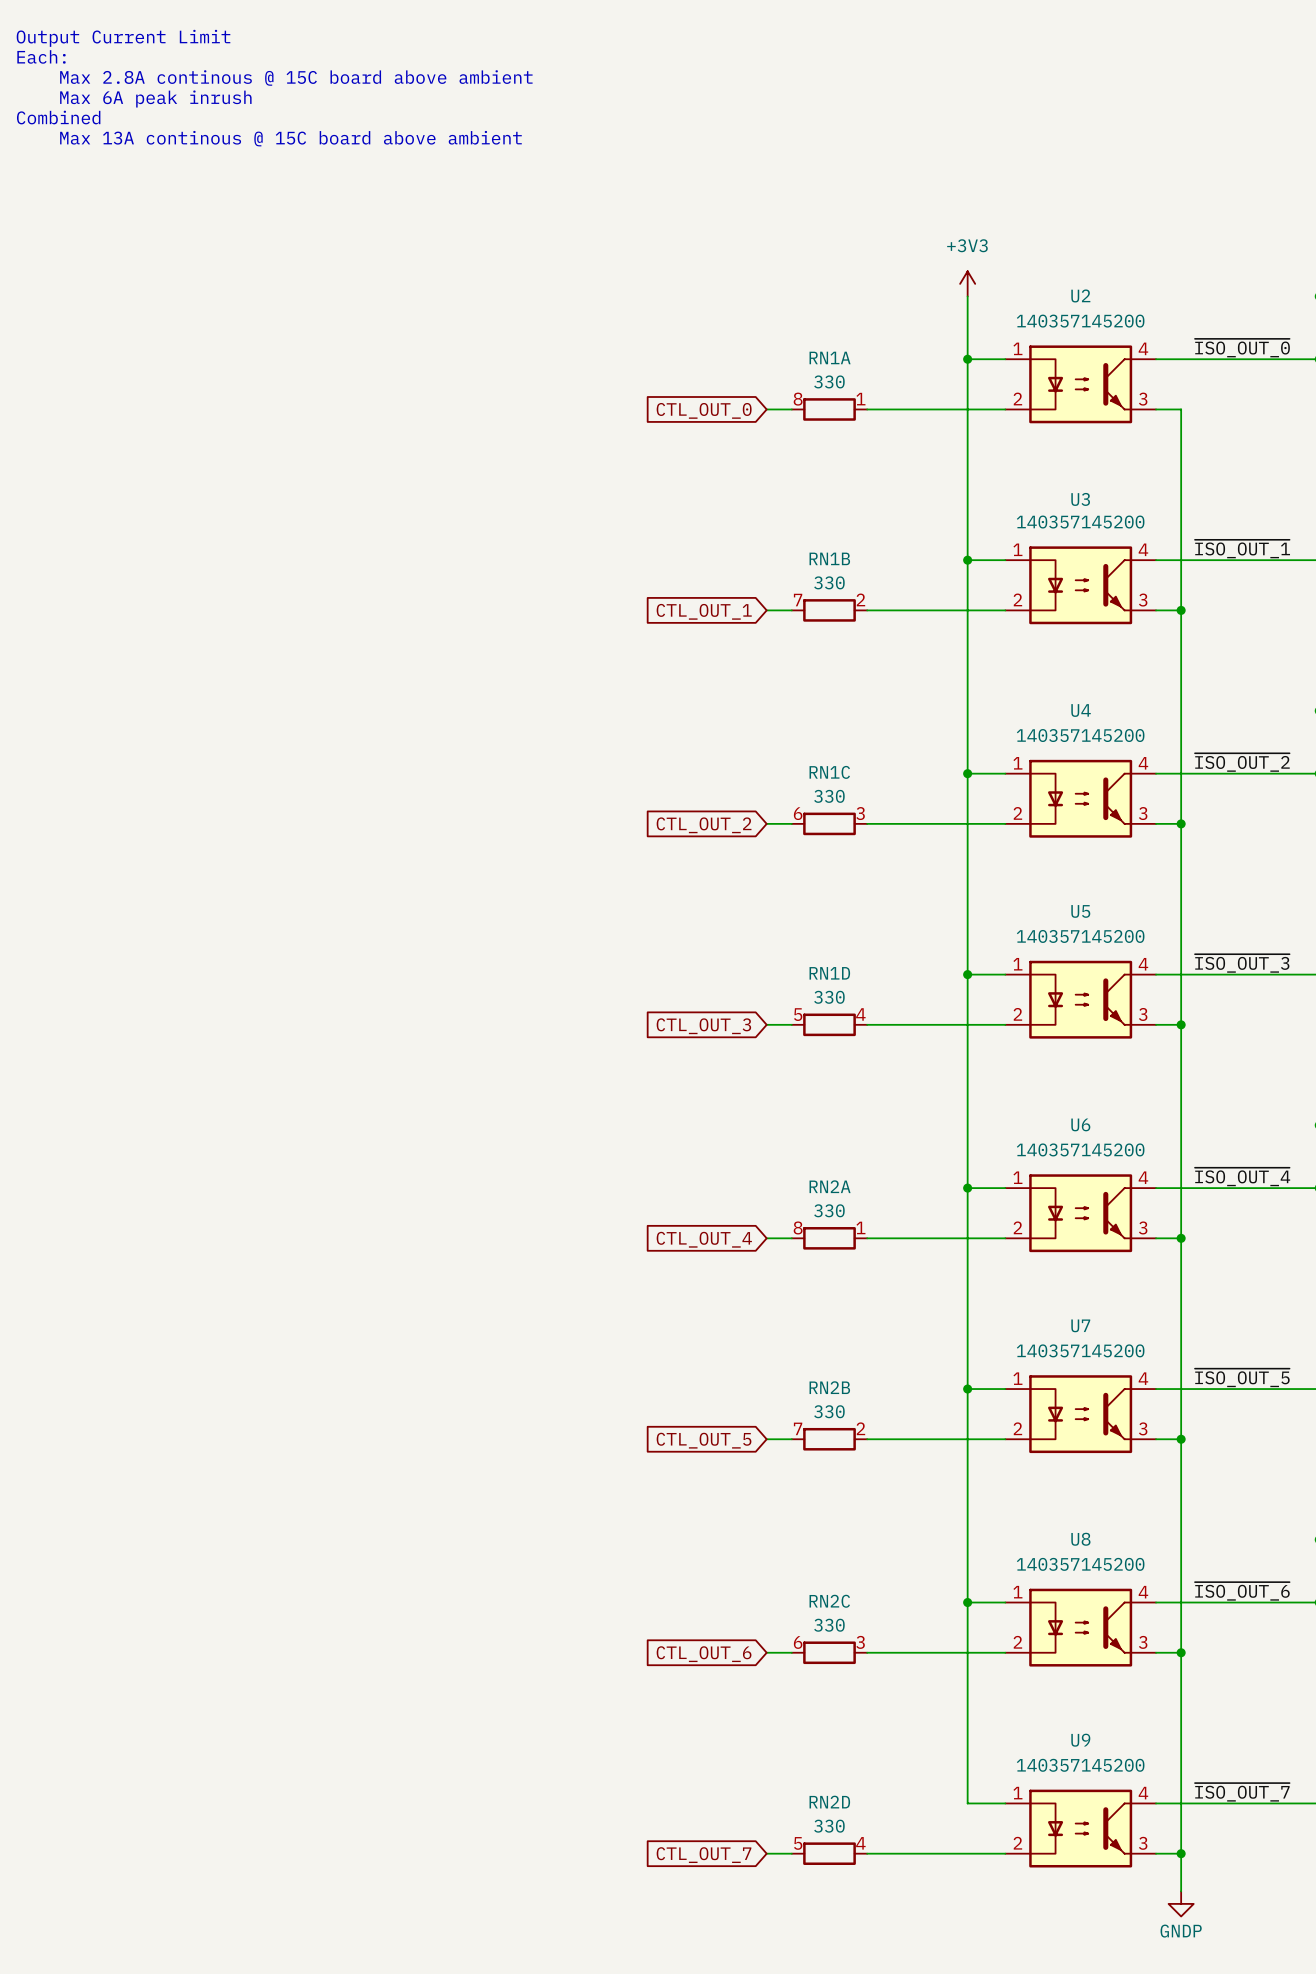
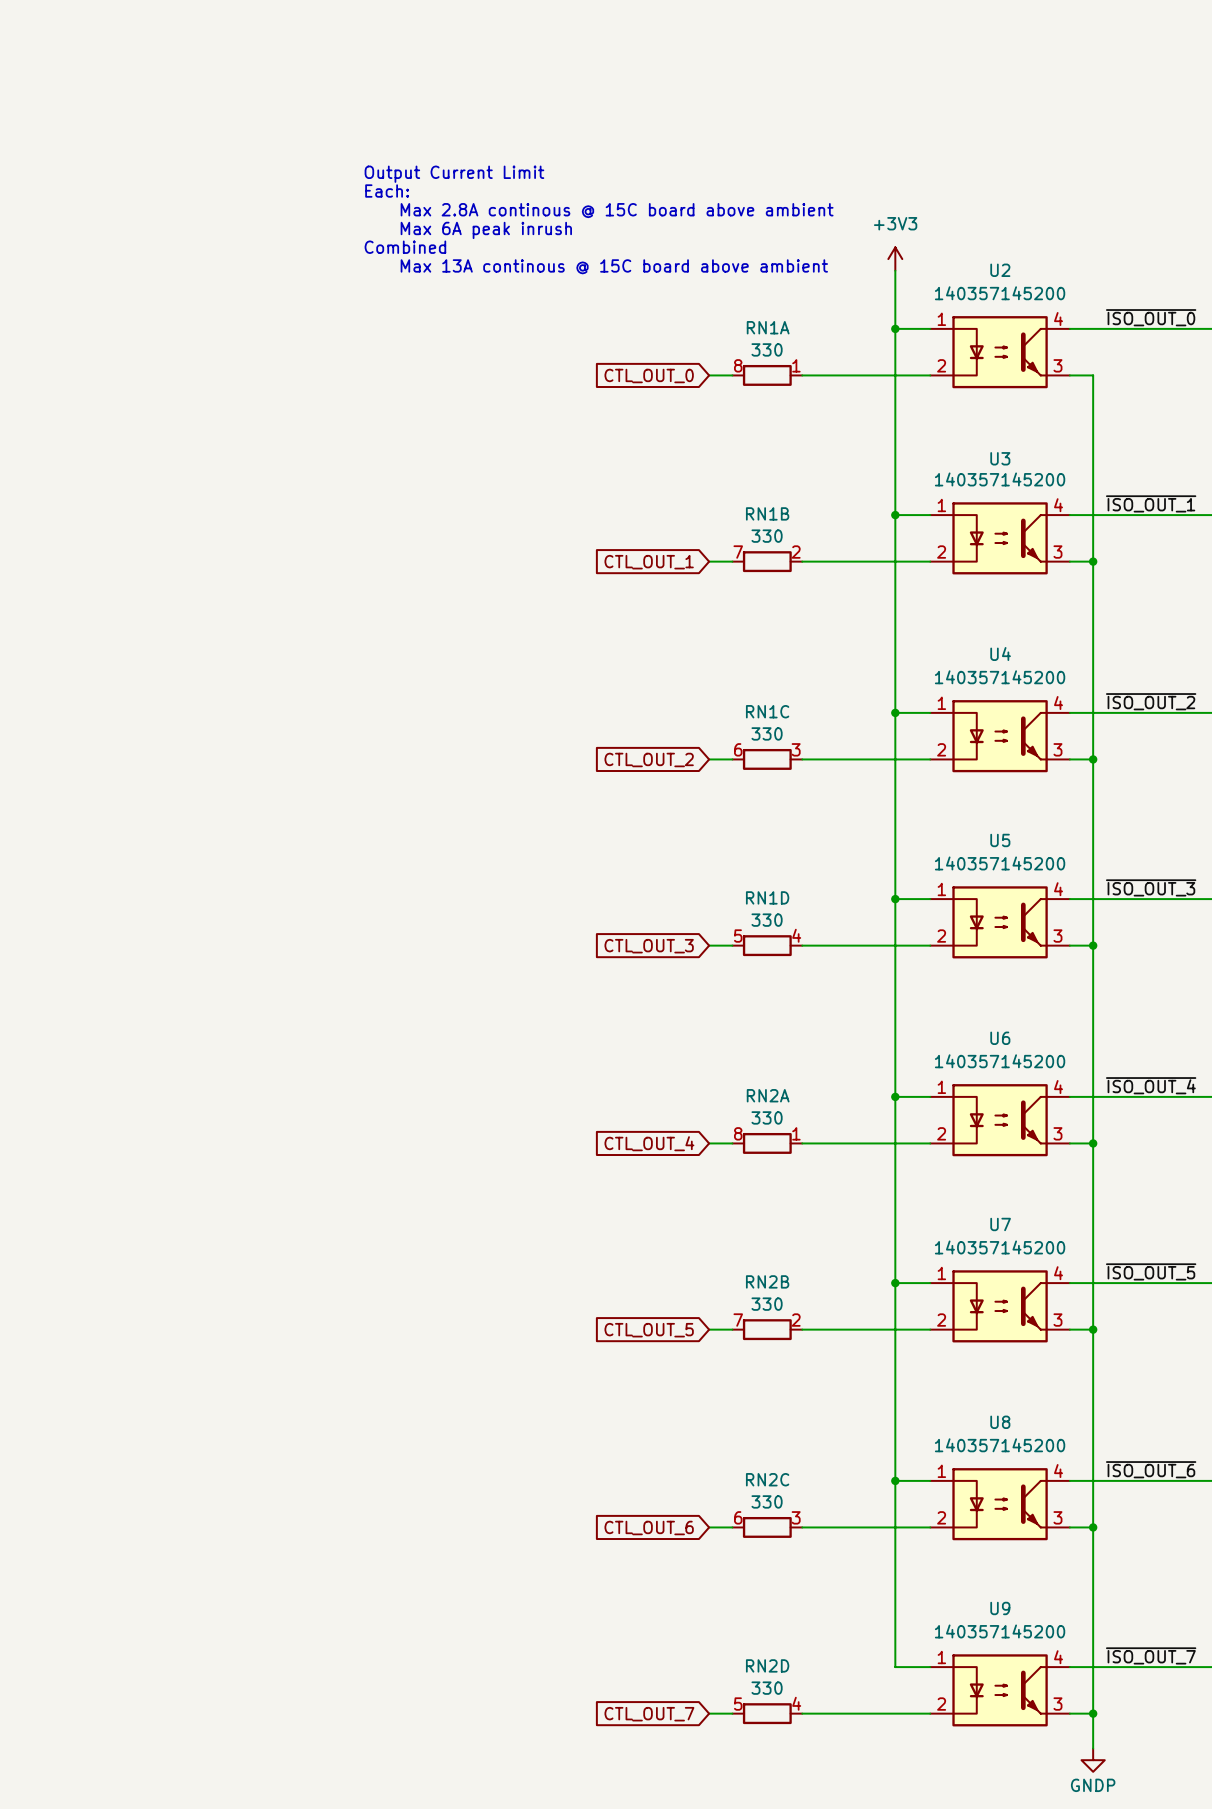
text: Output Current Limit (123, 38) -> none
text: Each: (41, 56) -> none
text: Max 2.8A continous @ 15C board above ambient (296, 77) -> none
text: Max 6A peak inrush (155, 99) -> none
text: Combined (58, 117) -> none
text: Max 13A continous @ 15C board above ambient (290, 138) -> none
text: none -> Output Current Limit (454, 174)
text: none -> Each: (387, 191)
text: none -> Max 2.8A continous @ 15C board above ambient (617, 210)
text: none -> Max 6A peak inrush (486, 230)
text: none -> Combined (405, 247)
text: none -> Max 13A continous @ 15C board above ambient (614, 266)

